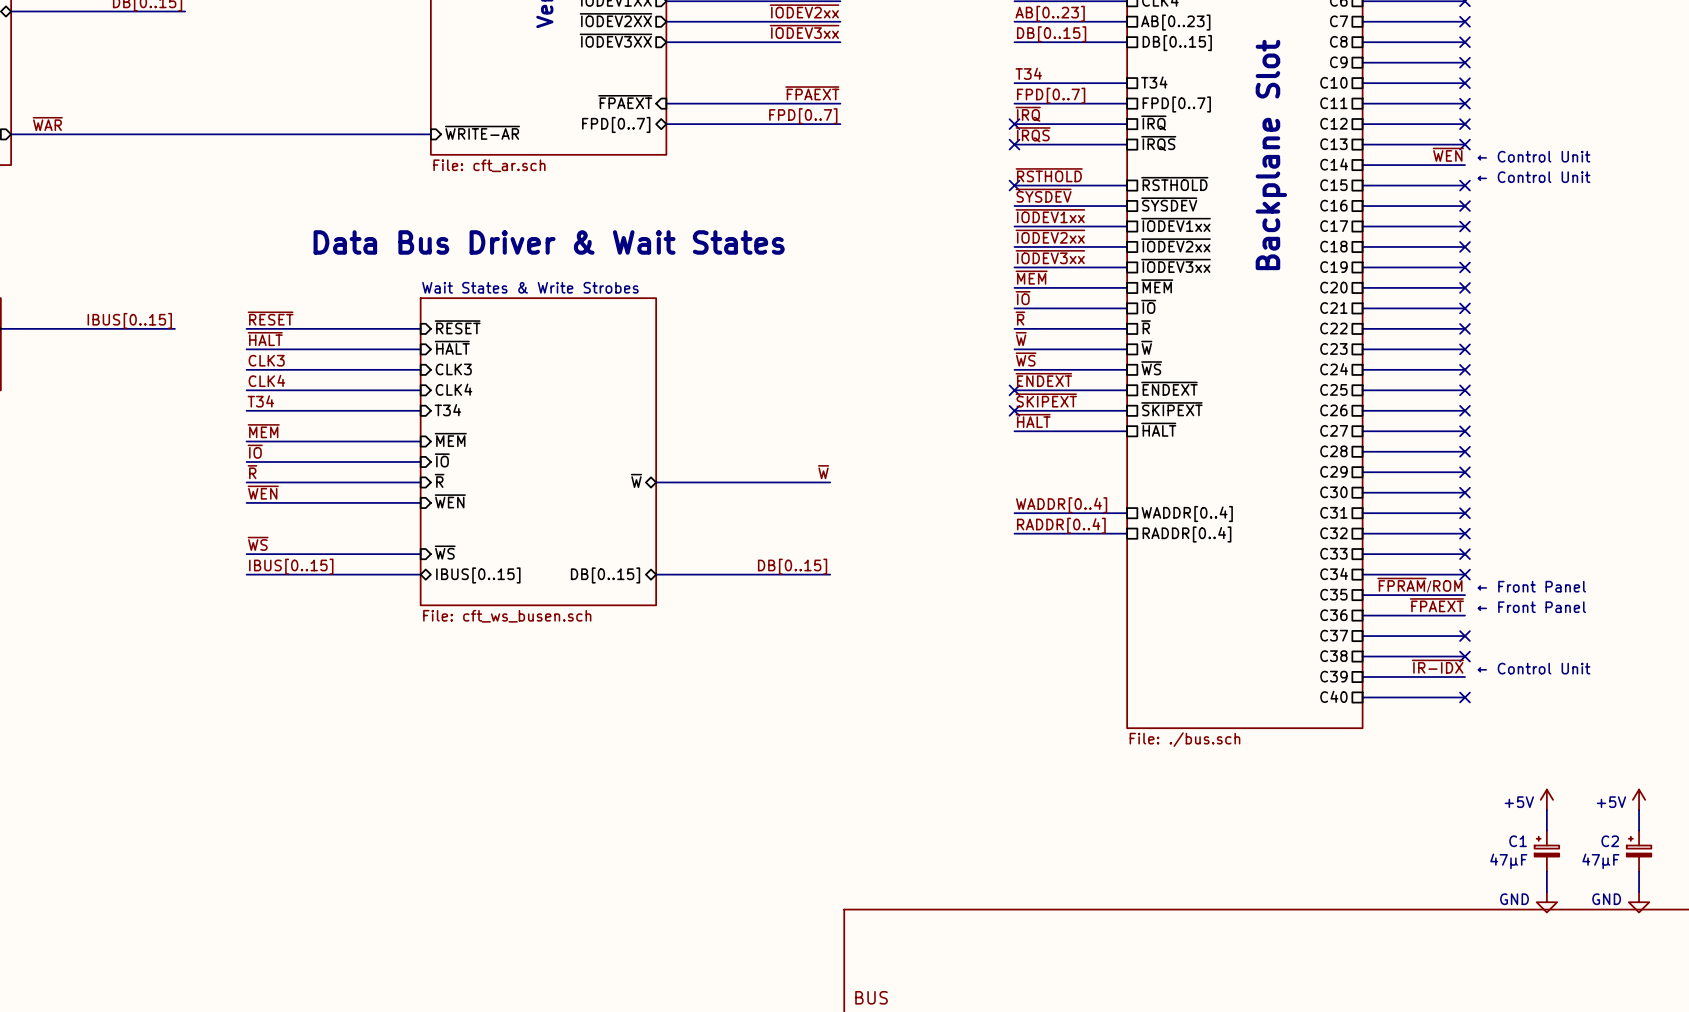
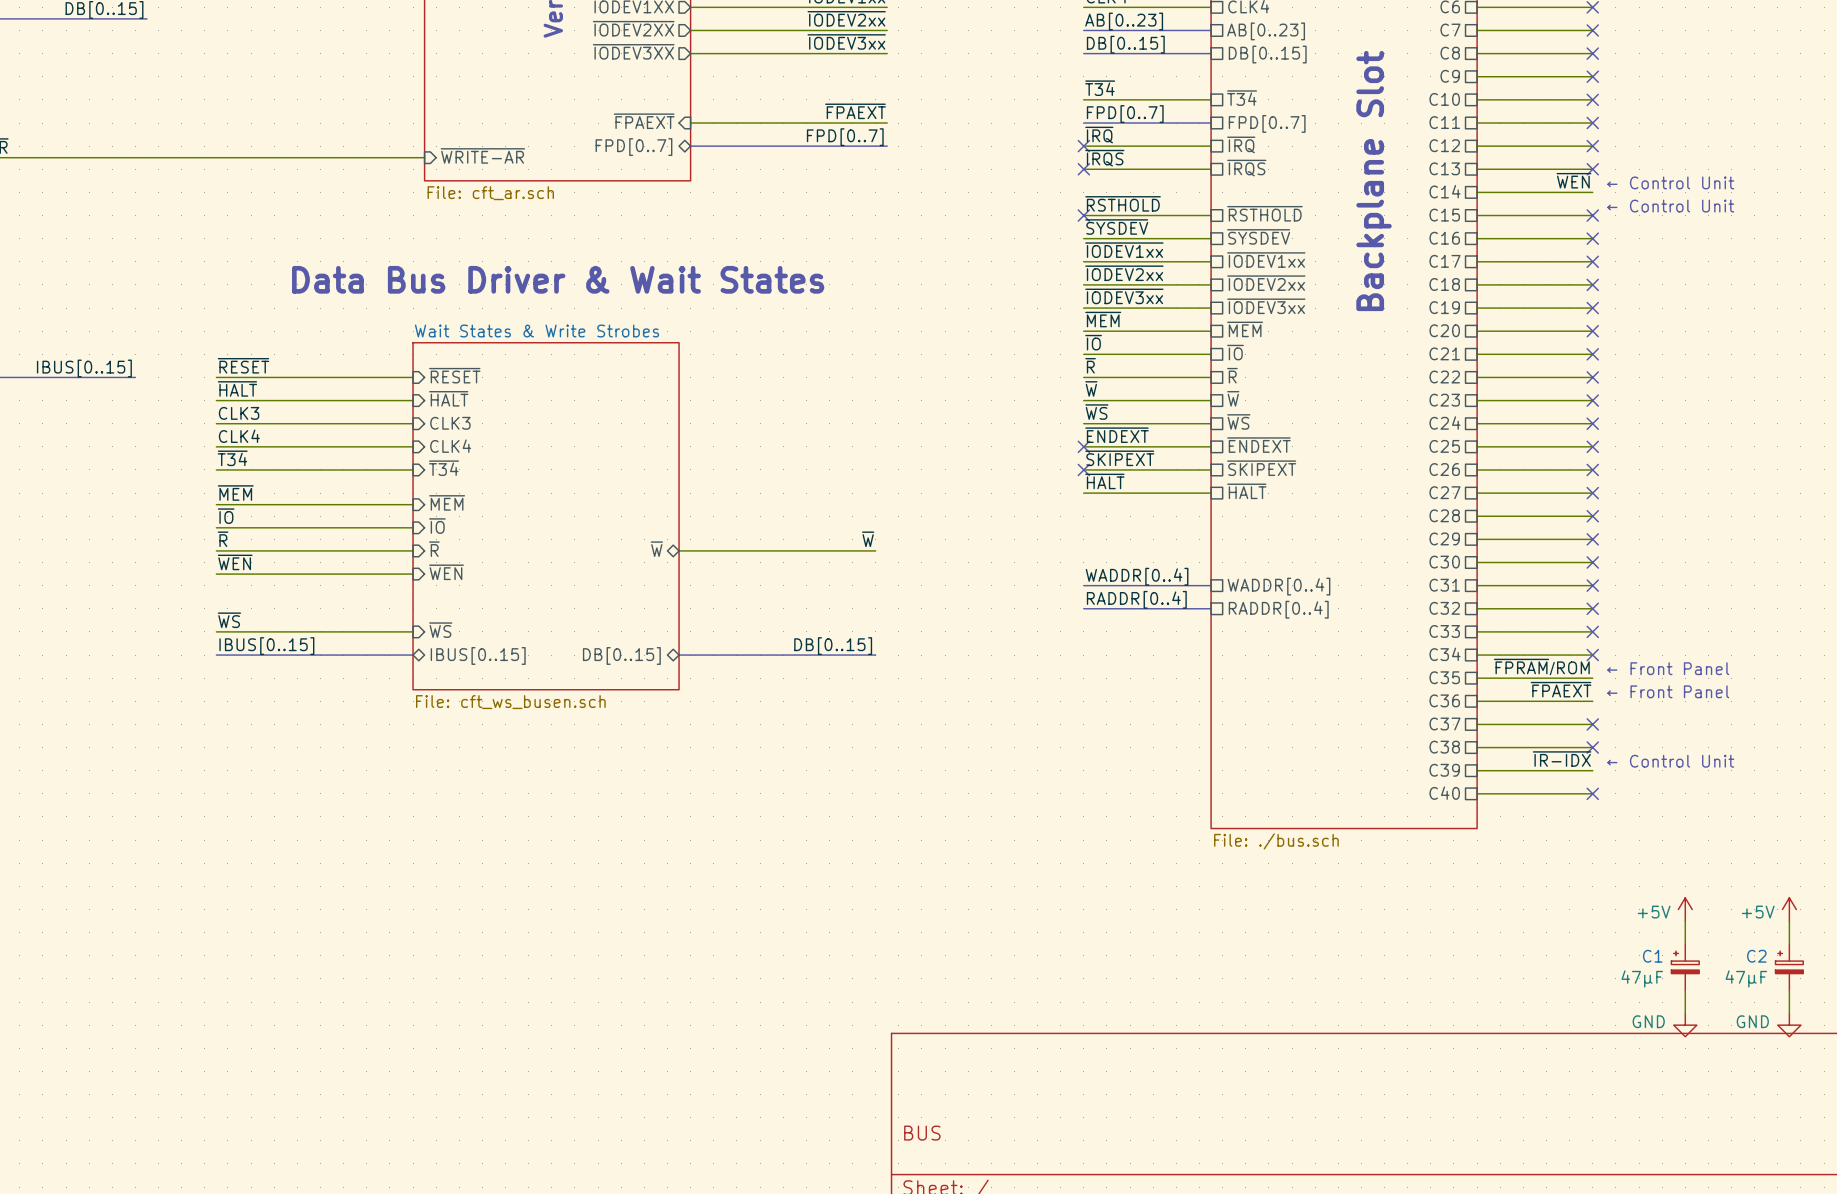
label: T34 (1028, 73) -> ~{T34} (1100, 88)
sheet pin: T34 (1154, 82) -> ~{T34} (1242, 98)
label: T34 (260, 401) -> ~{T34} (232, 458)
sheet pin: T34 (447, 410) -> ~{T34} (444, 468)

